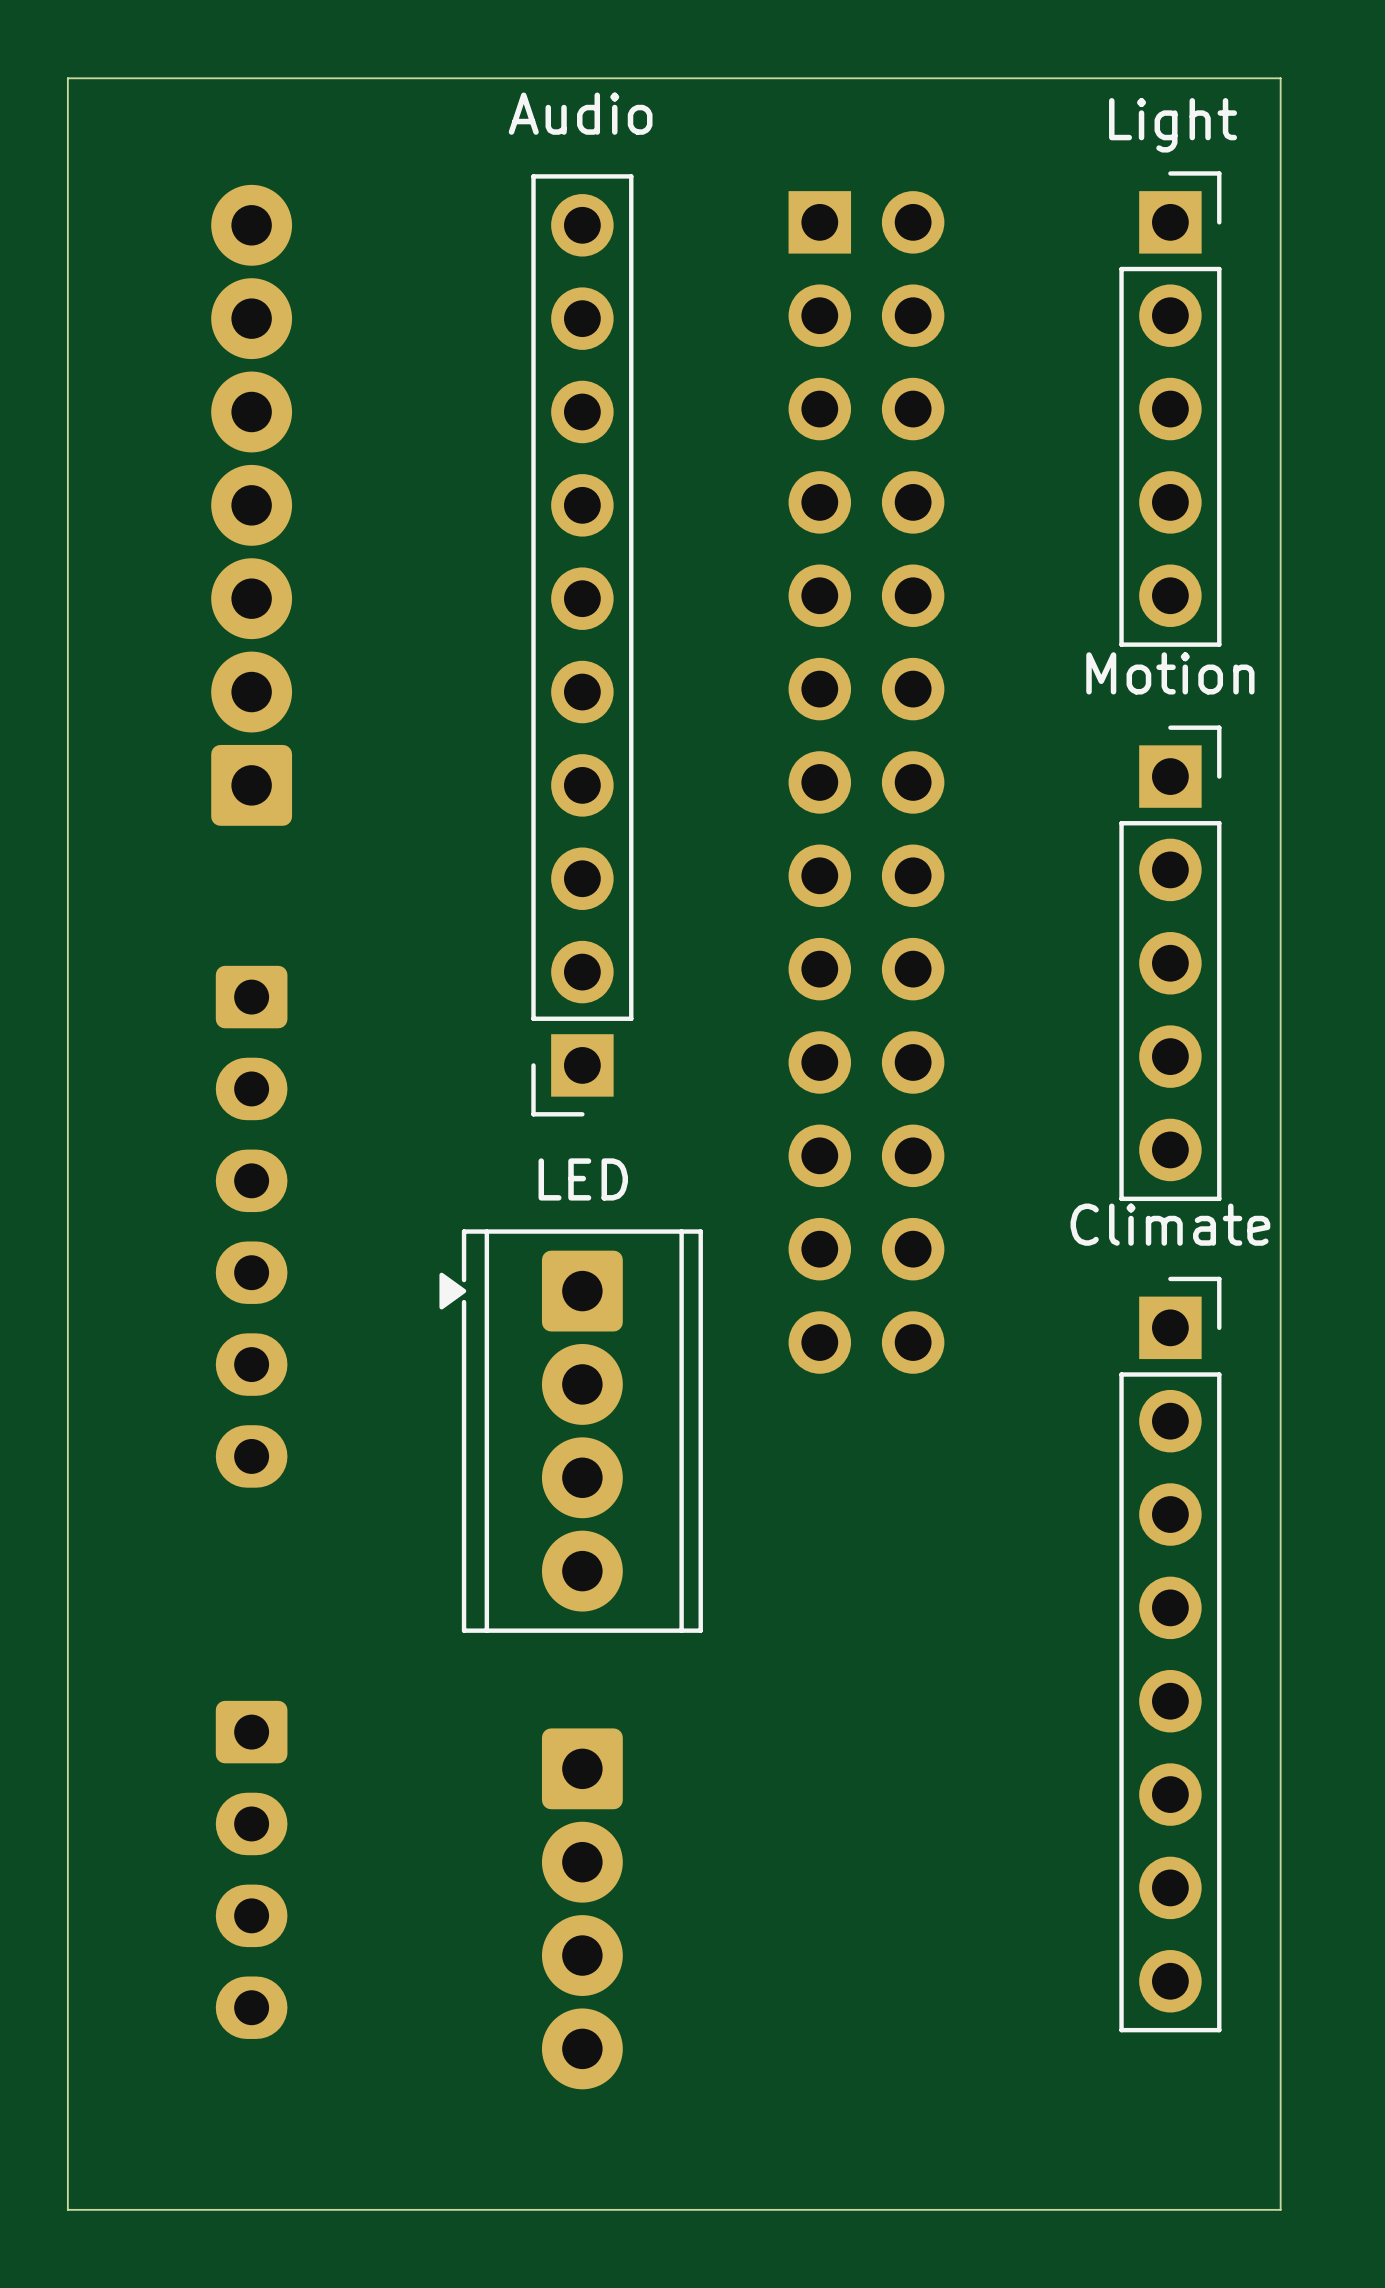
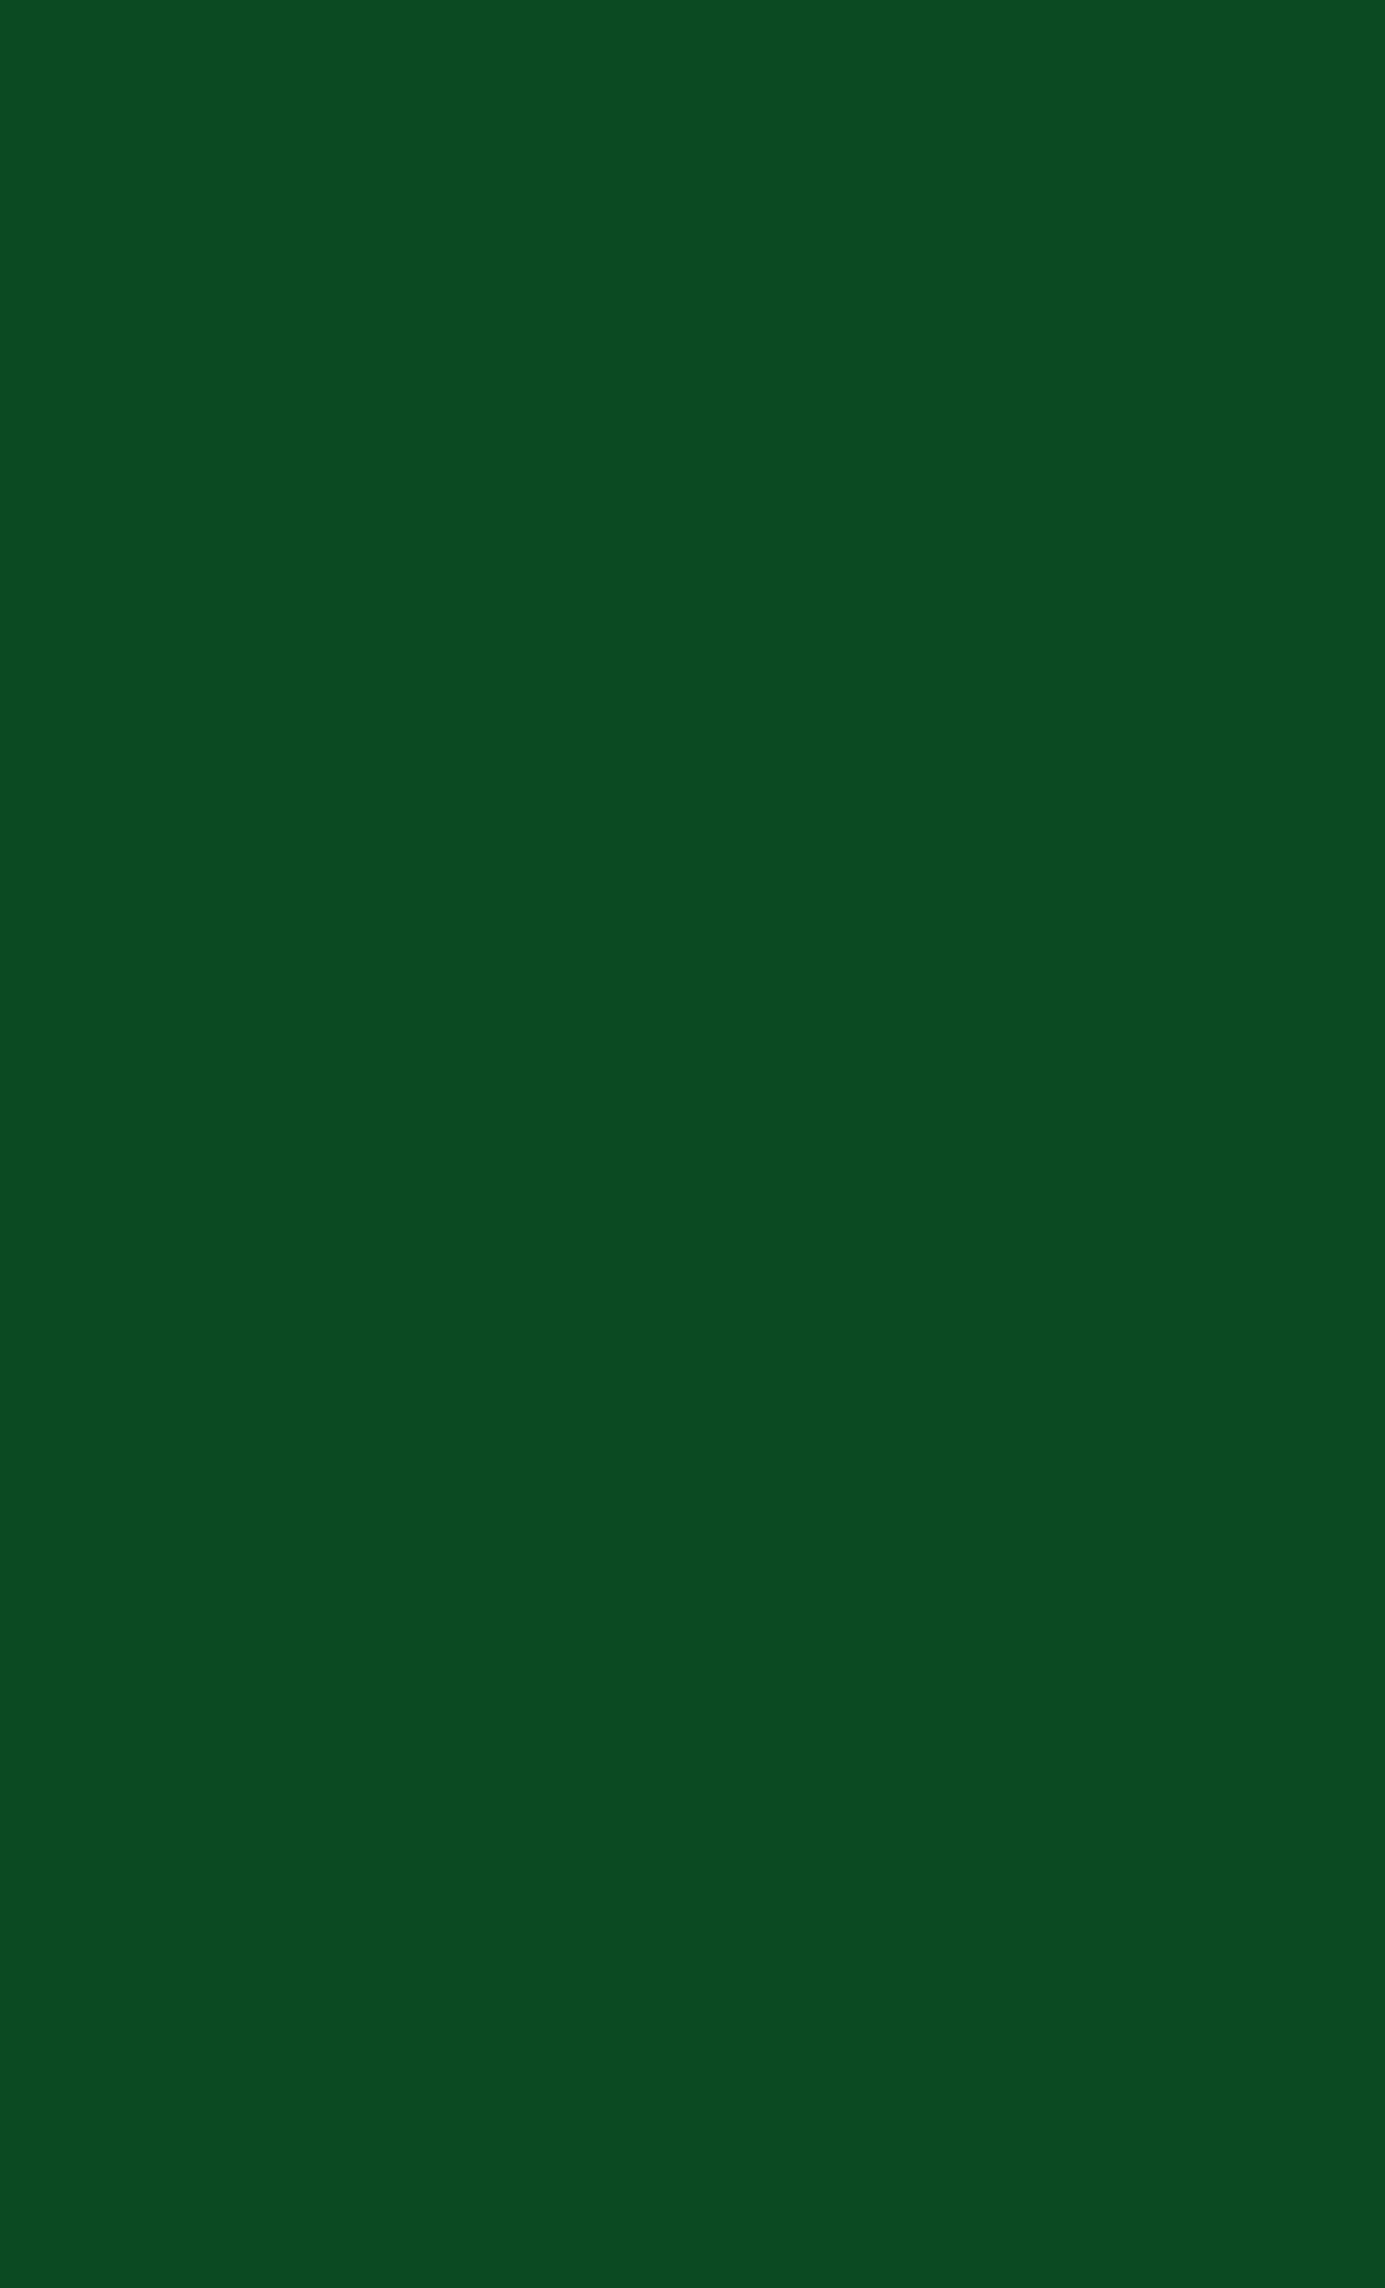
board edge: (67, 78) (1280, 78) (1280, 2209) (67, 2209) (67, 78) -> none
Light: (1170, 409) -> none
part: (251, 505) -> none
Audio: (582, 645) -> none
part: (866, 782) -> none
Motion: (1170, 963) -> none
part: (251, 1226) -> none
LED: (571, 1431) -> none
Climate: (1170, 1654) -> none
part: (251, 1869) -> none
part: (582, 1908) -> none

